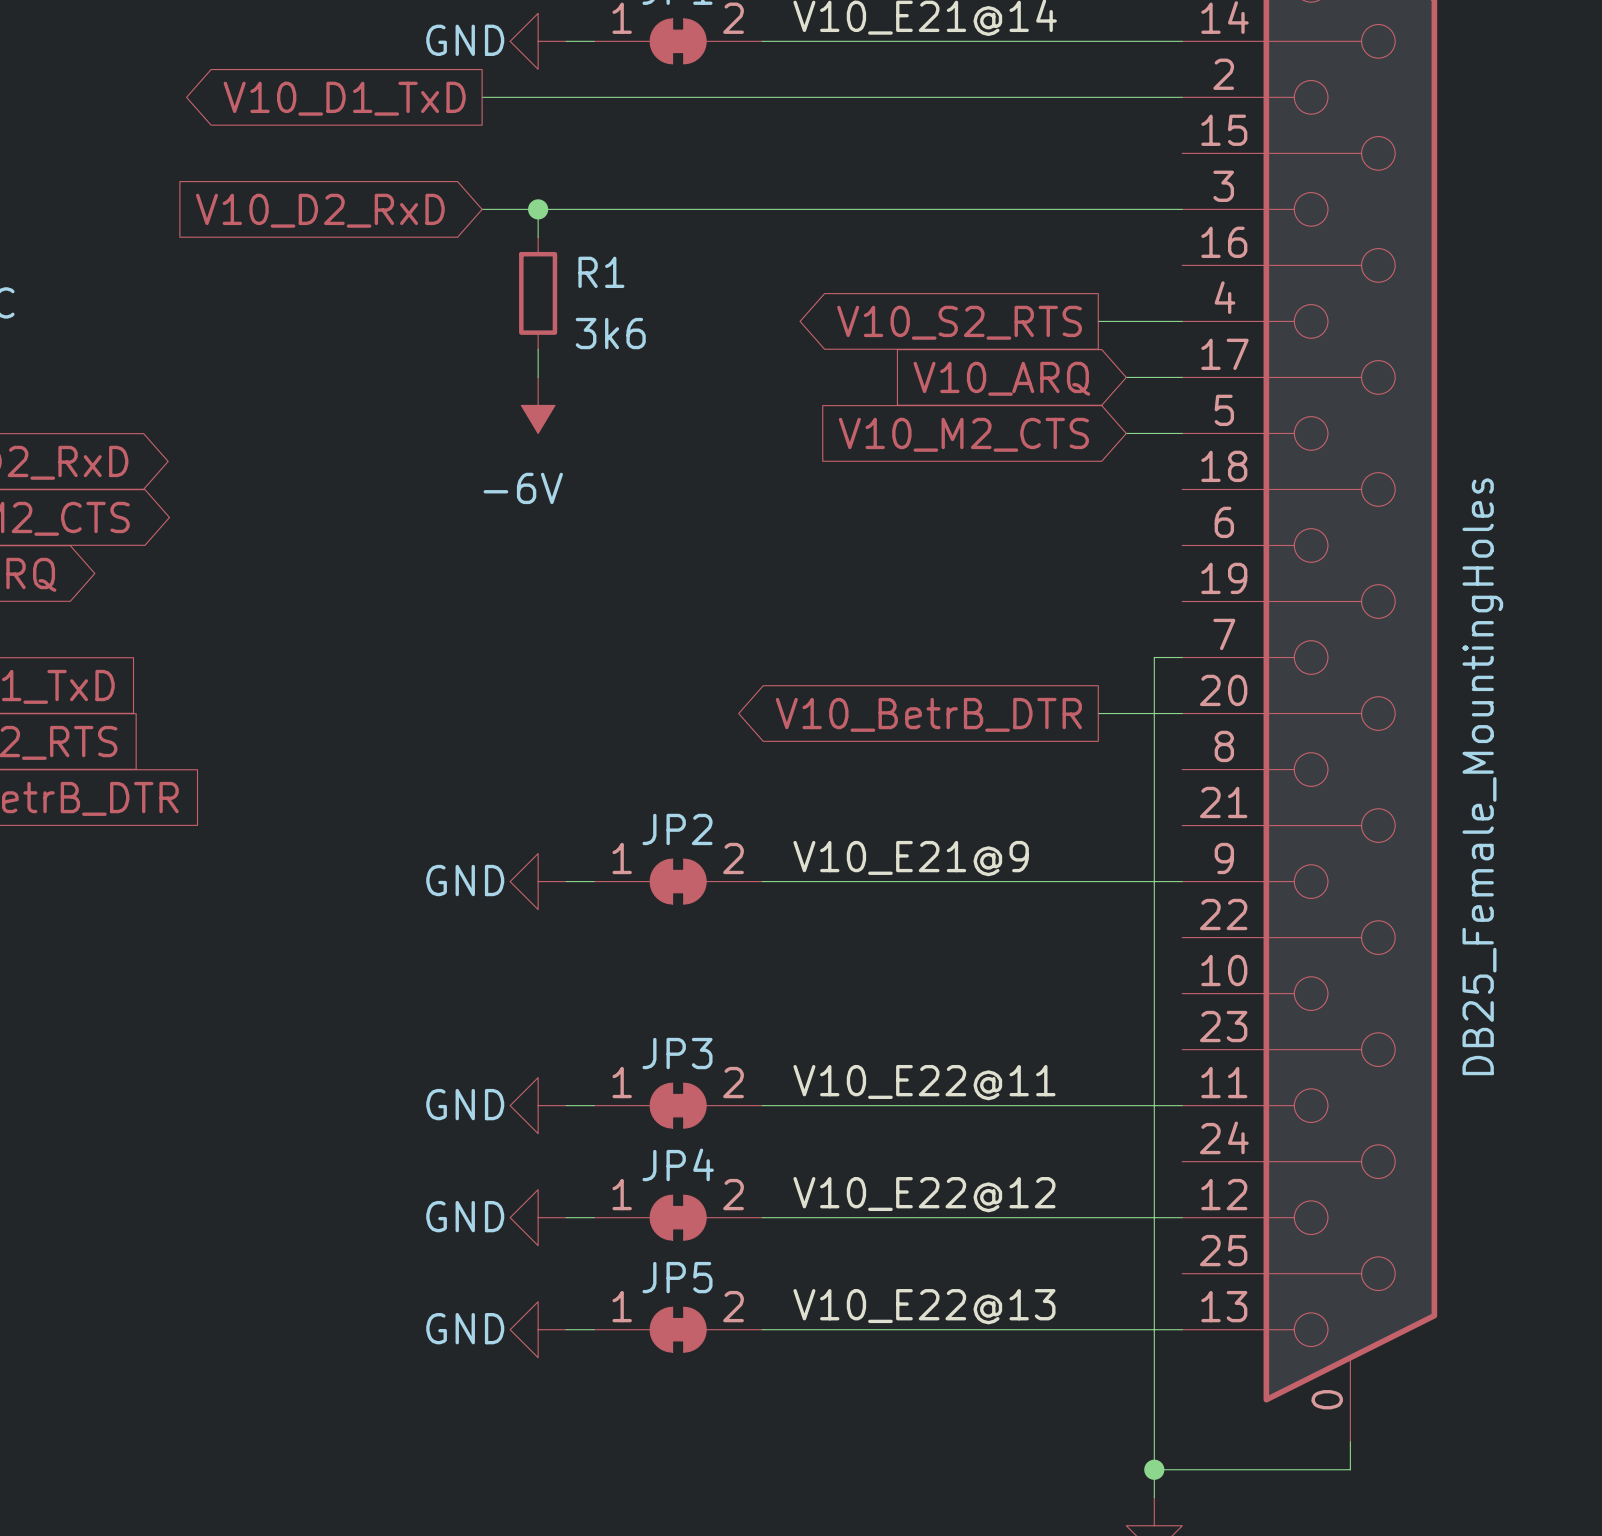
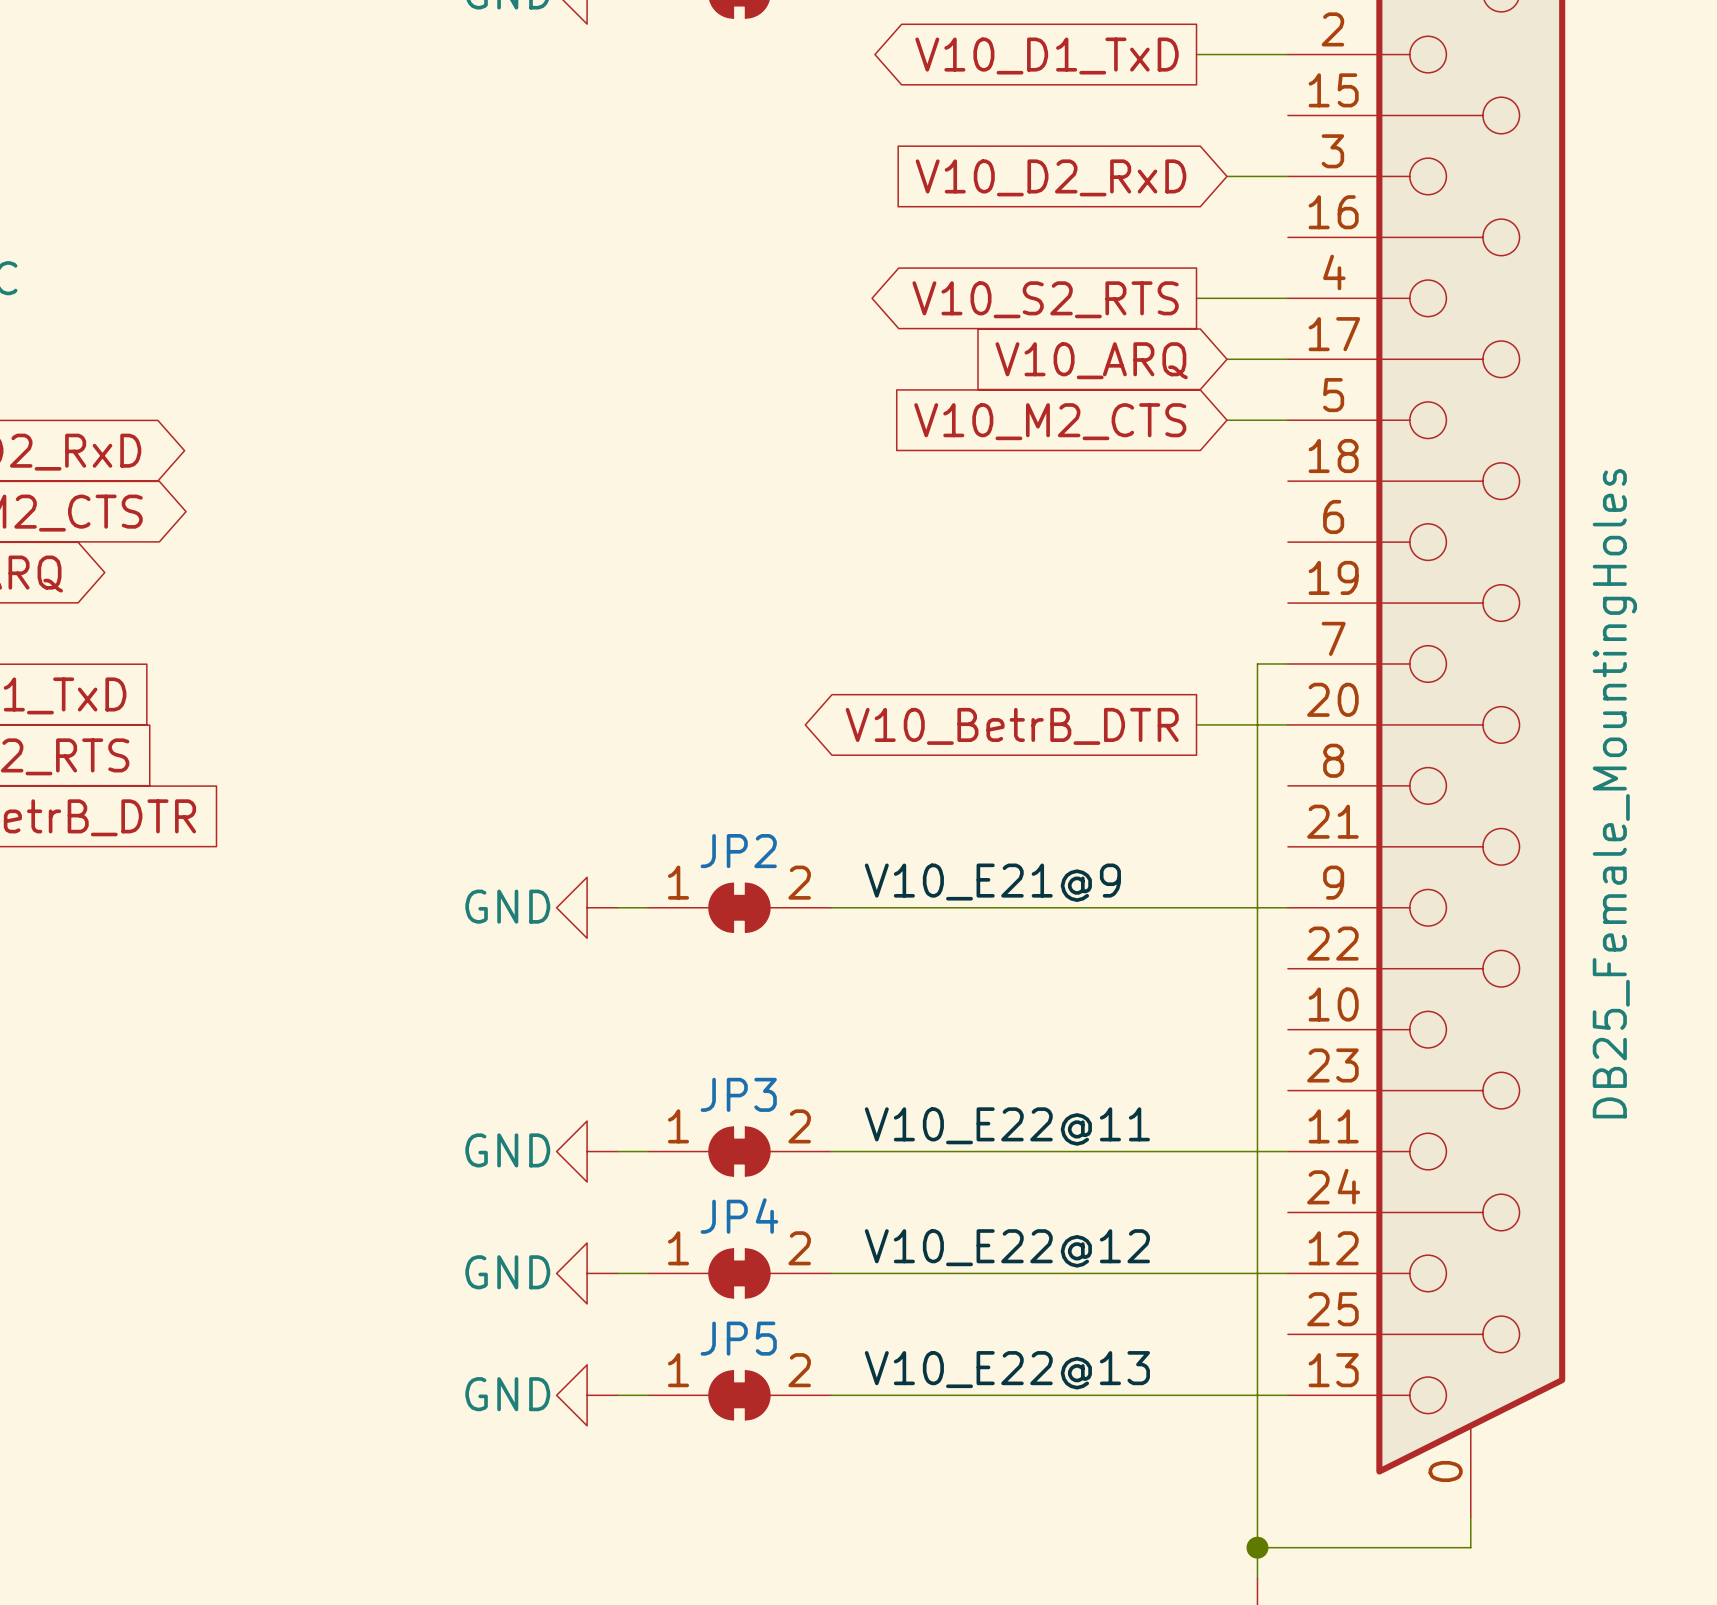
wire: (482, 97) (1098, 97) -> none
global label: V10_D1_TxD (344, 98) -> none
global label: none -> V10_D1_TxD (1047, 56)
wire: (482, 209) (1126, 209) -> none
wire: (538, 209) (538, 237) -> none
junction: (538, 209) -> none
global label: V10_D2_RxD (320, 210) -> none
global label: none -> V10_D2_RxD (1051, 177)
R1: 3k6 (538, 293) -> none
wire: (538, 349) (538, 377) -> none
power symbol: -6V (538, 405) -> none

